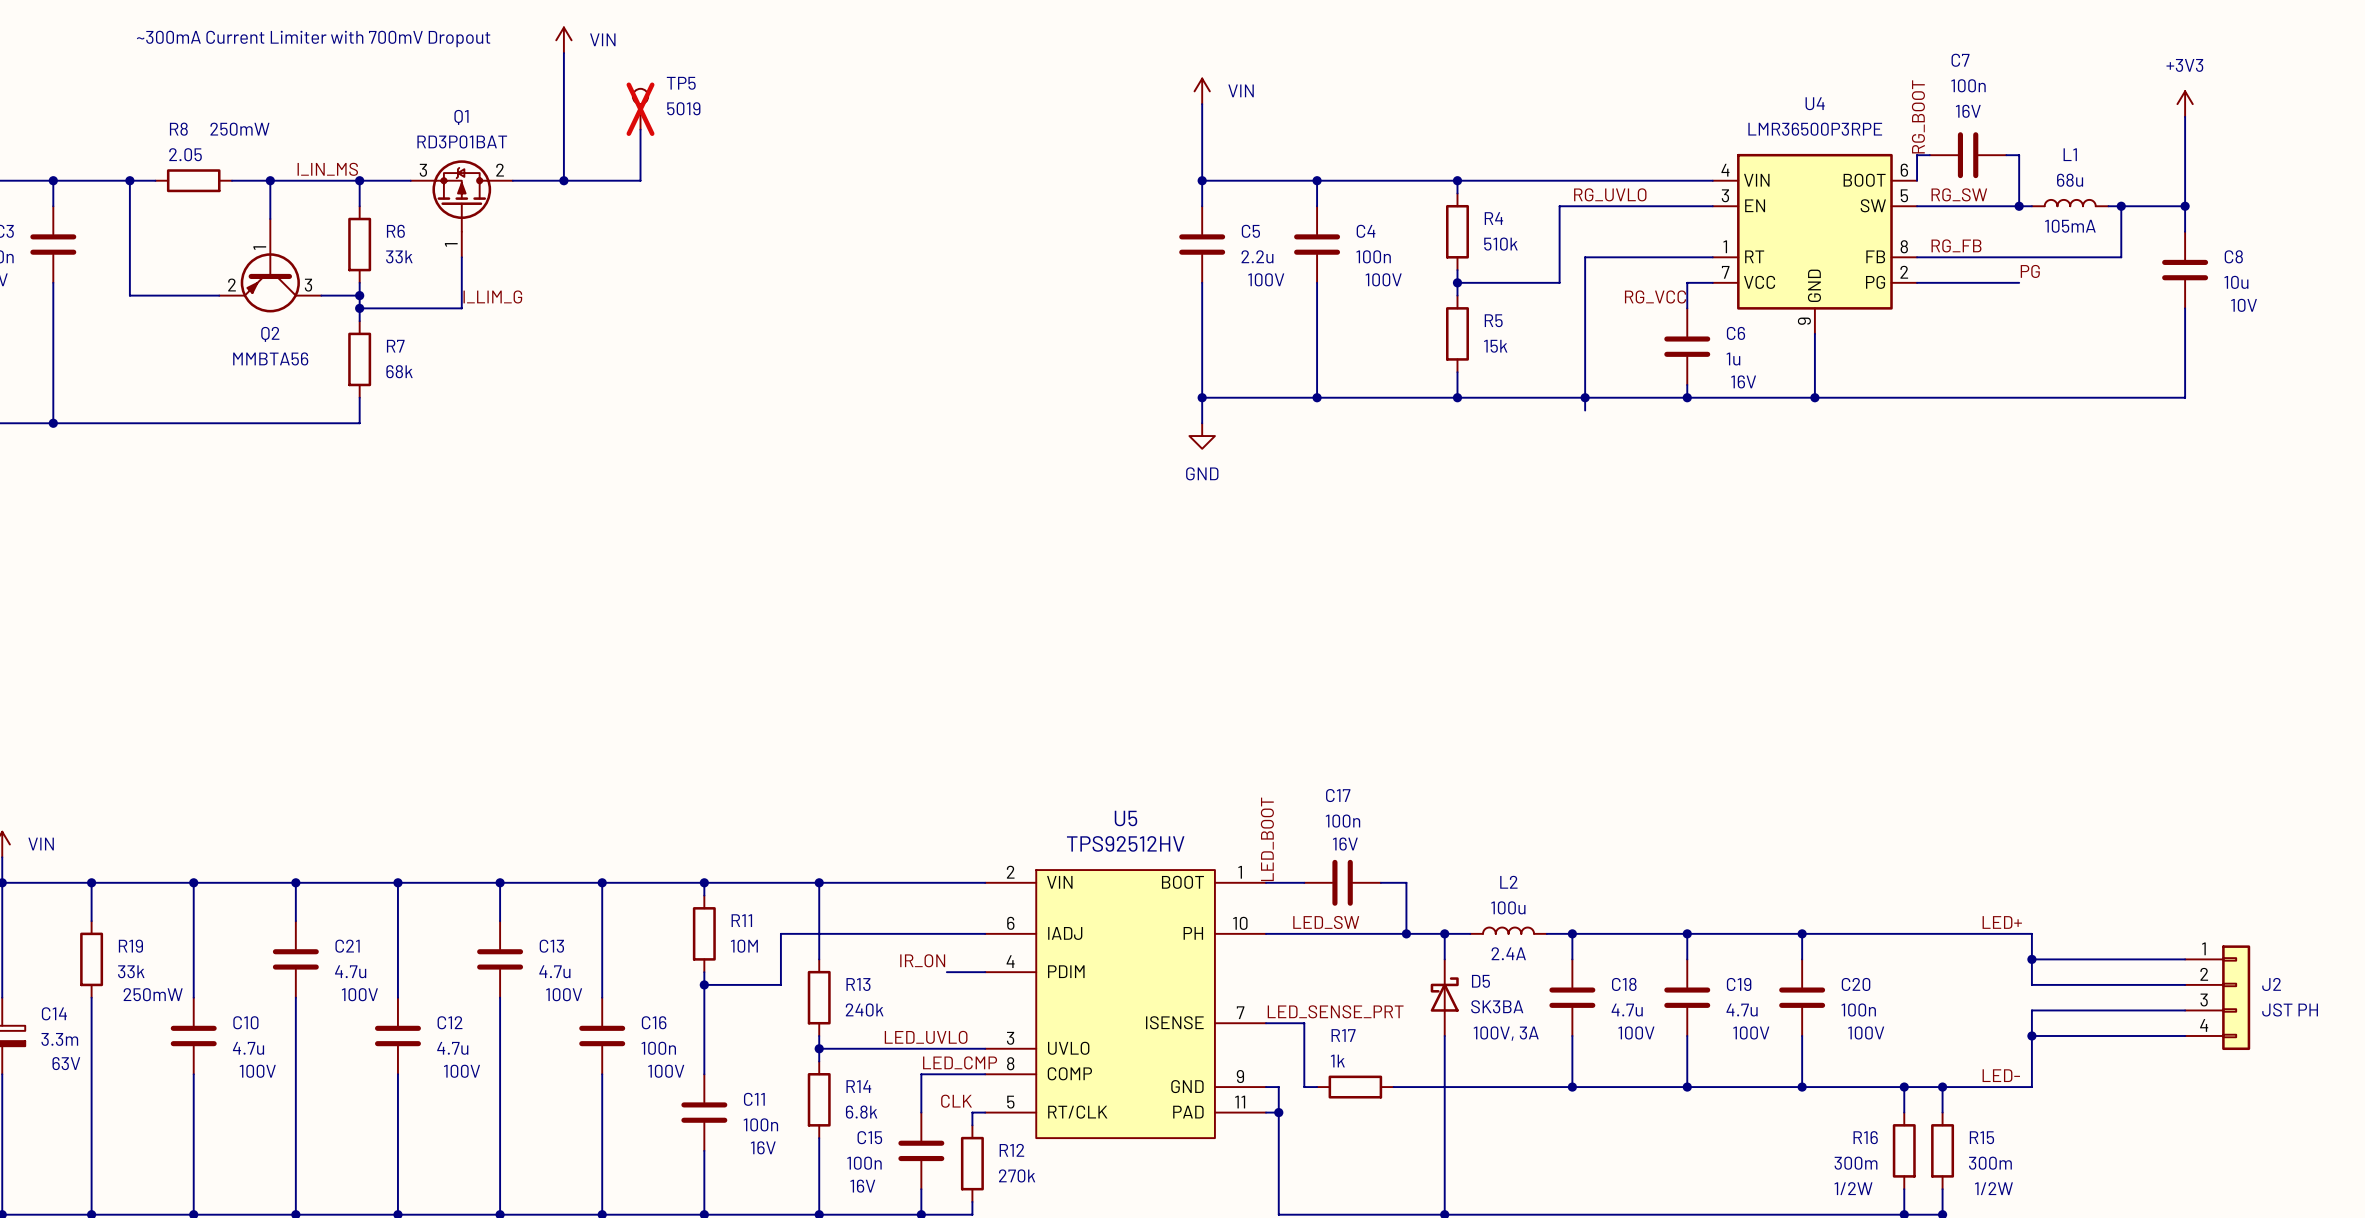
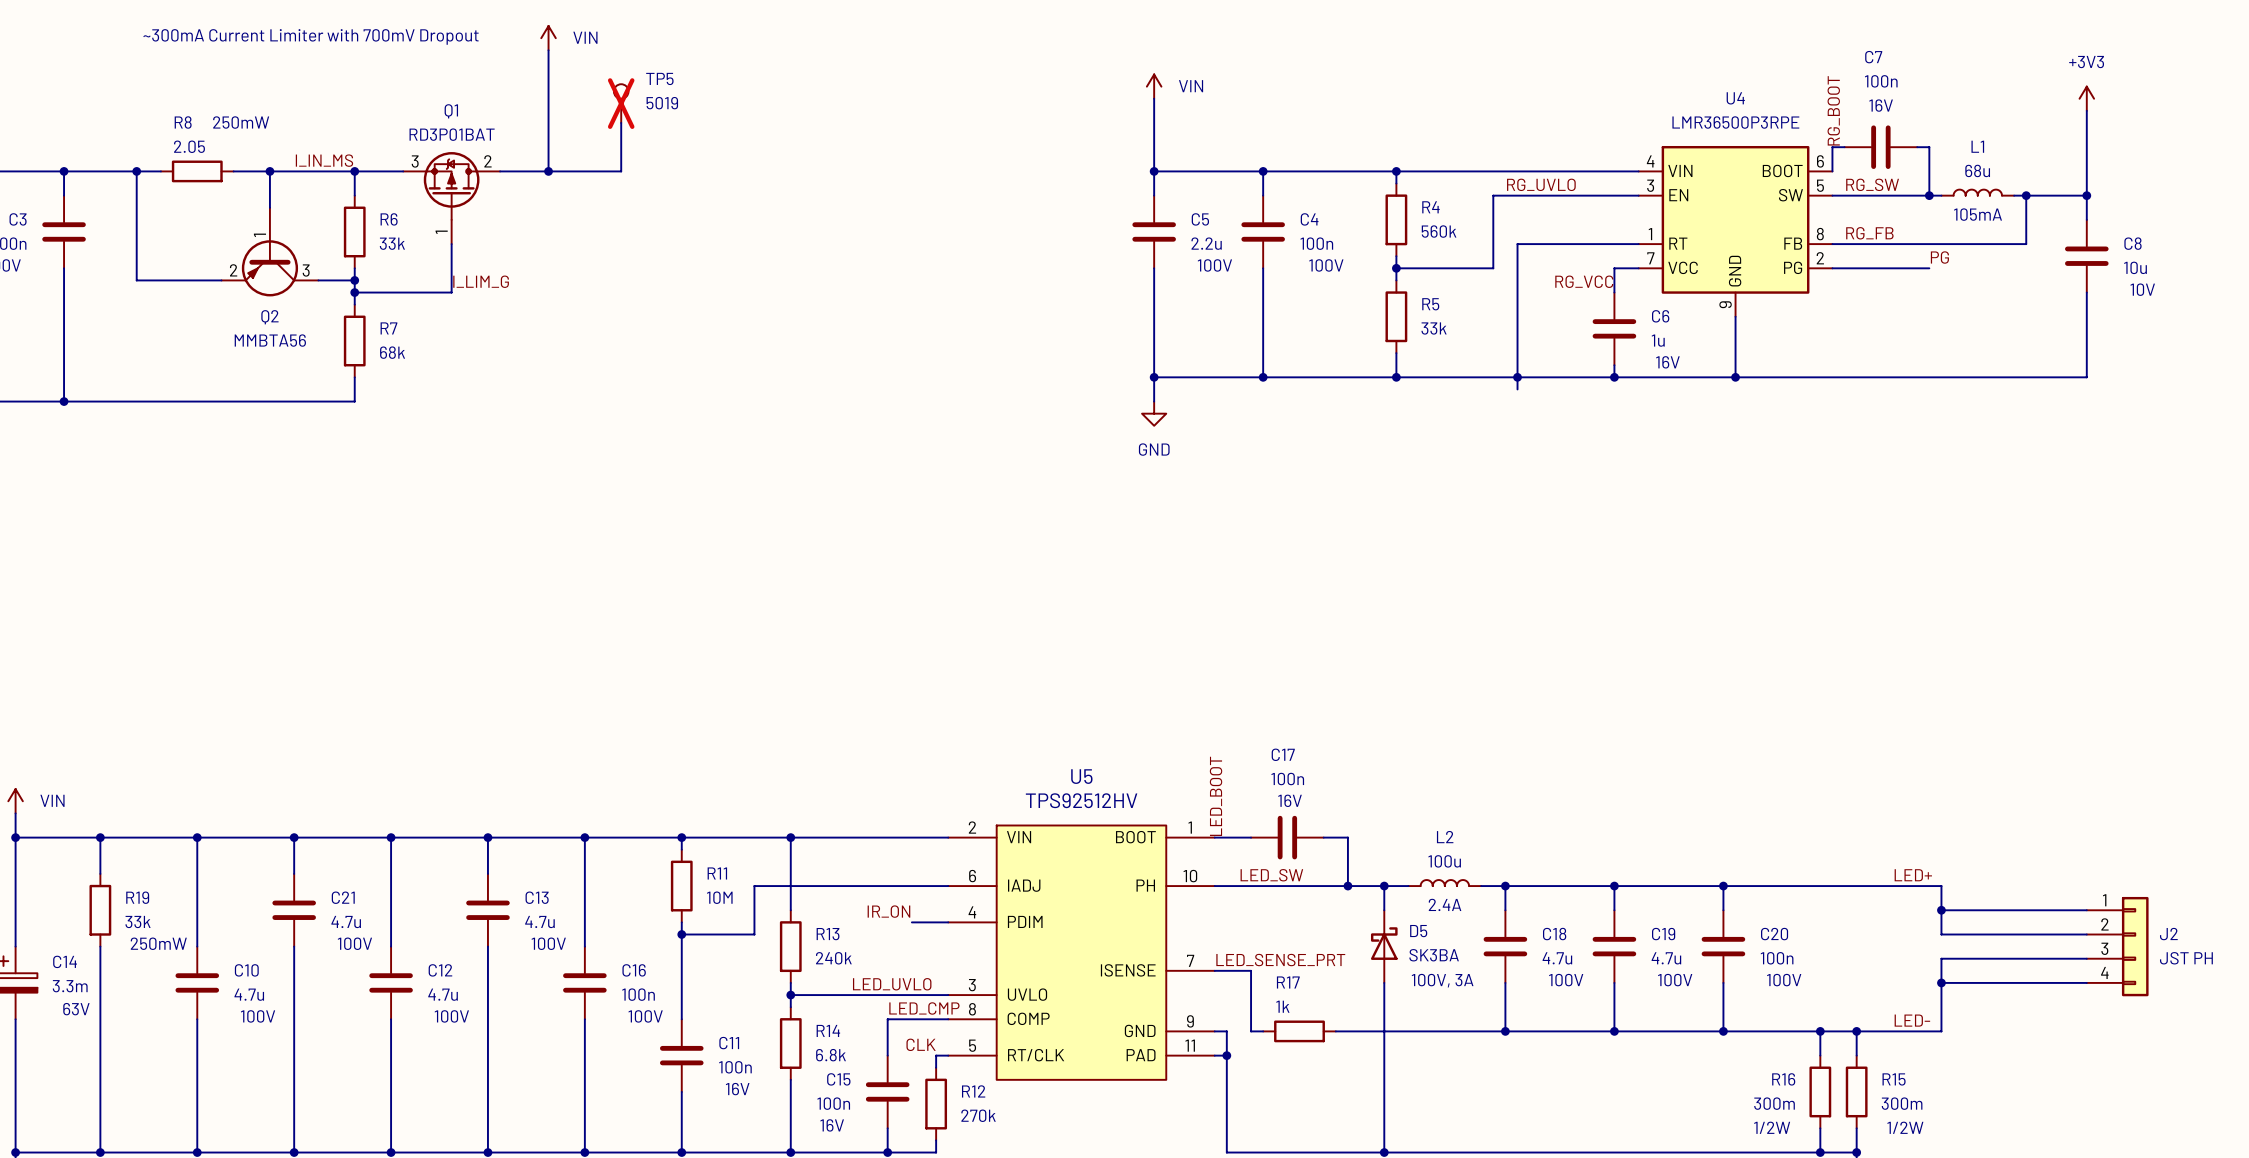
R4 value: 510k (1500, 244) -> 560k (1439, 231)
R5 value: 15k (1495, 346) -> 33k (1434, 328)

